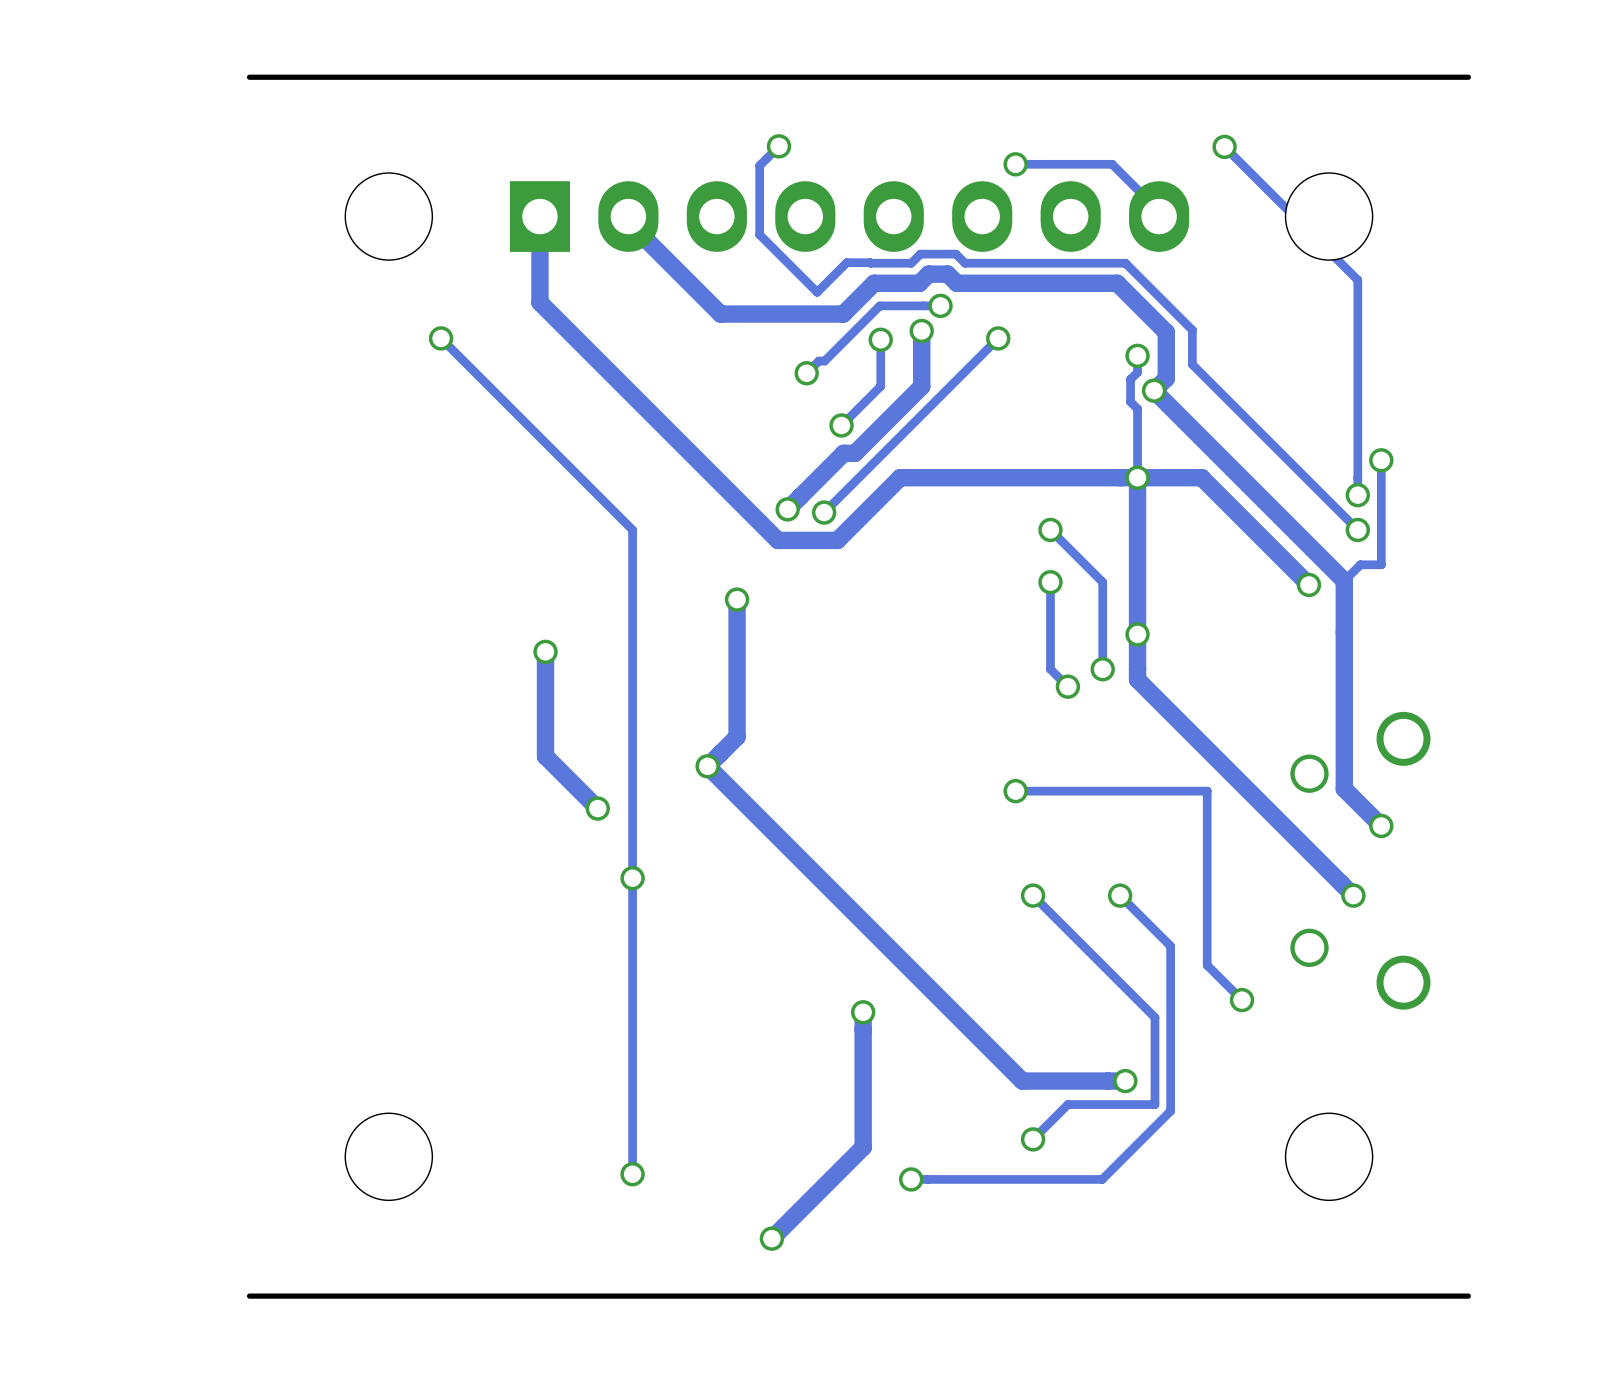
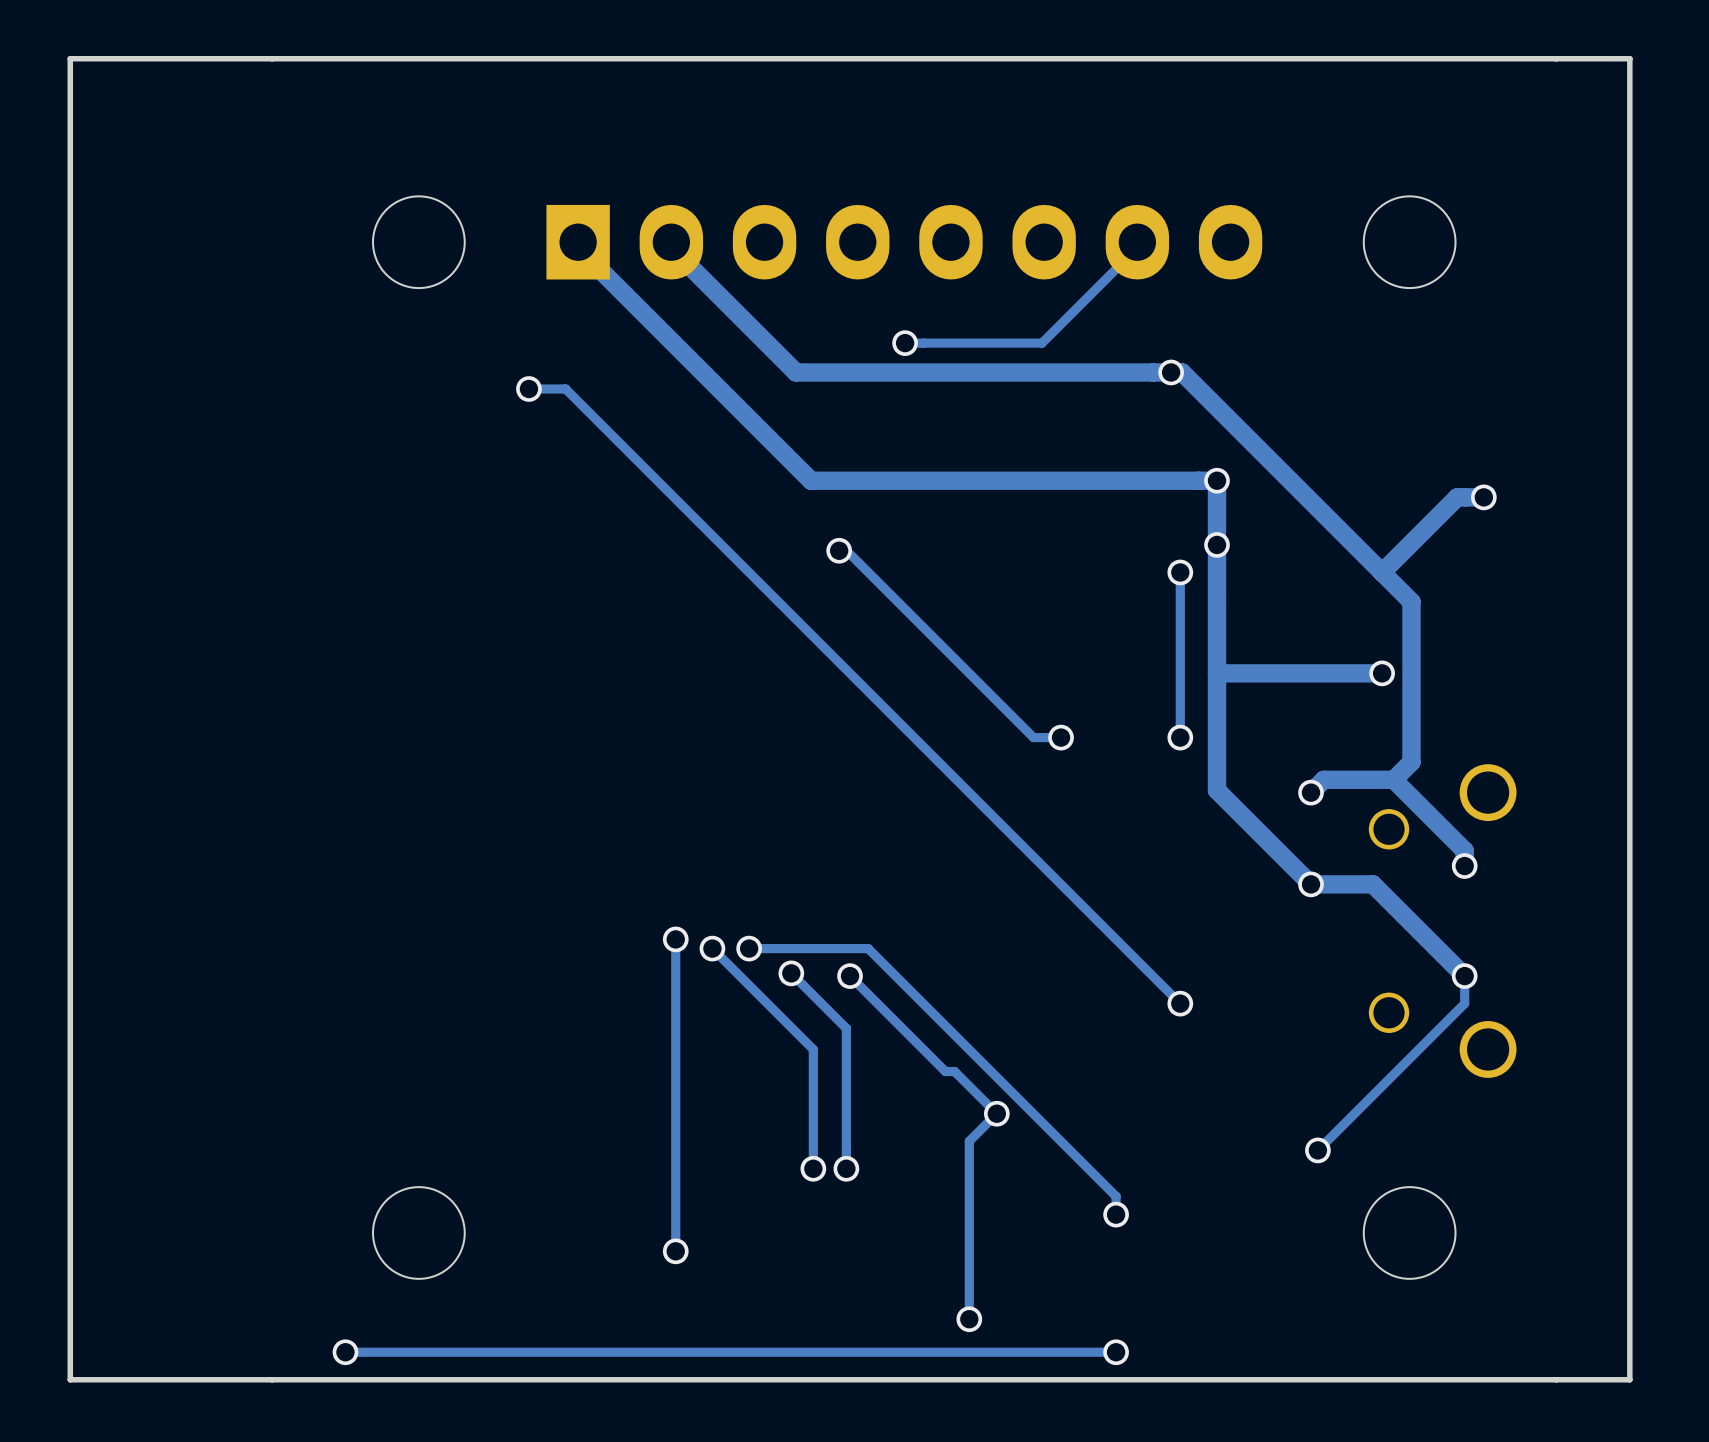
board edge: (1468, 77) (249, 77) -> none
track: (778, 146) (759, 165) (759, 234) (817, 292) (846, 262) (911, 263) (920, 254) (955, 254) (965, 263) (1125, 263) (1192, 330) (1192, 364) (1357, 529) -> none
via: (778, 146) -> none
track: (1224, 146) (1357, 280) (1357, 495) -> none
via: (1224, 146) -> none
track: (1015, 164) (1112, 164) (1159, 211) (1159, 216) -> none
via: (1015, 164) -> none
track: none -> (1137, 242) (1137, 247) (1042, 343) (905, 343)
track: (539, 221) (539, 302) (777, 540) (837, 540) (900, 477) (1201, 477) (1308, 584) -> (578, 247) (811, 480) (1217, 480) (1217, 790) (1311, 884) (1372, 884) (1464, 976) (1464, 1003) (1317, 1150)
track: (940, 305) (879, 305) (824, 361) (818, 361) (806, 373) -> none
via: (940, 305) -> none
via: none -> (905, 343)
track: (720, 314) (843, 314) (874, 283) (919, 283) (928, 274) (947, 274) (956, 283) (1117, 283) (1166, 332) (1166, 378) (1154, 390) (1344, 580) -> (768, 344) (796, 372) (1182, 372) (1411, 601) (1411, 762) (1393, 779)
track: (921, 330) (921, 386) (854, 453) (843, 453) (787, 509) -> none
via: (921, 330) -> none
track: (441, 338) (632, 529) (632, 886) -> none
via position: (441, 338) -> (528, 388)
track: (998, 338) (824, 512) -> none
via: (998, 338) -> none
track: (880, 339) (880, 386) (841, 425) -> none
via: (880, 339) -> none
via: none -> (1171, 372)
track: none -> (528, 388) (565, 388) (1180, 1003)
track: (1137, 355) (1137, 372) (1130, 379) (1130, 401) (1137, 408) (1137, 679) (1353, 895) -> none
via: (1137, 355) -> none
via: (806, 373) -> none
via: (1154, 390) -> none
via: (841, 425) -> none
via: none -> (1217, 480)
track: none -> (1483, 497) (1457, 497) (1382, 572)
track: (1381, 460) (1381, 564) (1360, 564) (1344, 580) -> none
via position: (1381, 460) -> (1483, 497)
via: (1137, 477) -> none
via: (1357, 495) -> none
via: none -> (1217, 544)
track: none -> (850, 554) (1033, 737) (1061, 737)
via: (824, 512) -> none
track: (1050, 529) (1102, 582) (1102, 669) -> none
via: (1050, 529) -> none
track: none -> (1180, 572) (1180, 737)
via: none -> (1180, 572)
via: (1357, 529) -> none
track: (1344, 580) (1344, 788) (1381, 825) -> none
track: (1050, 582) (1050, 669) (1067, 686) -> none
via: (1050, 582) -> none
via position: (1308, 584) -> (1382, 673)
track: (737, 599) (737, 736) (707, 766) (1022, 1081) (1125, 1081) -> none
via: (737, 599) -> none
track: none -> (1382, 673) (1217, 673)
via: (1137, 634) -> none
track: (545, 651) (545, 756) (597, 808) -> none
via: (545, 651) -> none
via position: (1102, 669) -> (1180, 737)
via: none -> (1061, 737)
via: (1067, 686) -> none
track: none -> (1393, 779) (1464, 850) (1464, 866)
track: none -> (1393, 779) (1323, 779) (1311, 792)
via: none -> (1311, 792)
via: (707, 766) -> none
track: (1015, 791) (1207, 791) (1207, 965) (1242, 1000) -> none
via: (1015, 791) -> none
via: (597, 808) -> none
via: none -> (1311, 884)
via position: (1381, 825) -> (1464, 866)
track: none -> (712, 948) (813, 1049) (813, 1168)
via: none -> (712, 948)
track: none -> (749, 948) (868, 948) (1116, 1196) (1116, 1214)
via: none -> (749, 948)
track: (1033, 895) (1154, 1017) (1154, 1104) (1067, 1104) (1033, 1139) -> none
via: (1033, 895) -> none
track: (1120, 895) (1170, 946) (1170, 1111) (1102, 1179) (911, 1179) -> none
via position: (1120, 895) -> (1180, 1003)
via position: (1353, 895) -> (1464, 976)
track: none -> (791, 973) (846, 1028) (846, 1168)
via: none -> (791, 973)
track: none -> (850, 976) (945, 1071) (954, 1071) (996, 1113) (969, 1141) (969, 1319)
via: none -> (850, 976)
via: (1242, 1000) -> none
track: (863, 1012) (863, 1147) (771, 1238) -> none
via: (863, 1012) -> none
via: none -> (996, 1113)
via: none -> (1317, 1150)
via: (1125, 1081) -> none
via: none -> (813, 1168)
via: none -> (846, 1168)
via position: (1033, 1139) -> (1116, 1214)
via position: (911, 1179) -> (969, 1319)
via: (771, 1238) -> none
via: none -> (345, 1352)
track: none -> (1116, 1352) (345, 1352)
via: none -> (1116, 1352)
board edge: none -> (1556, 1379) (1629, 1379) (1629, 58) (70, 58) (70, 1379) (272, 1379)

